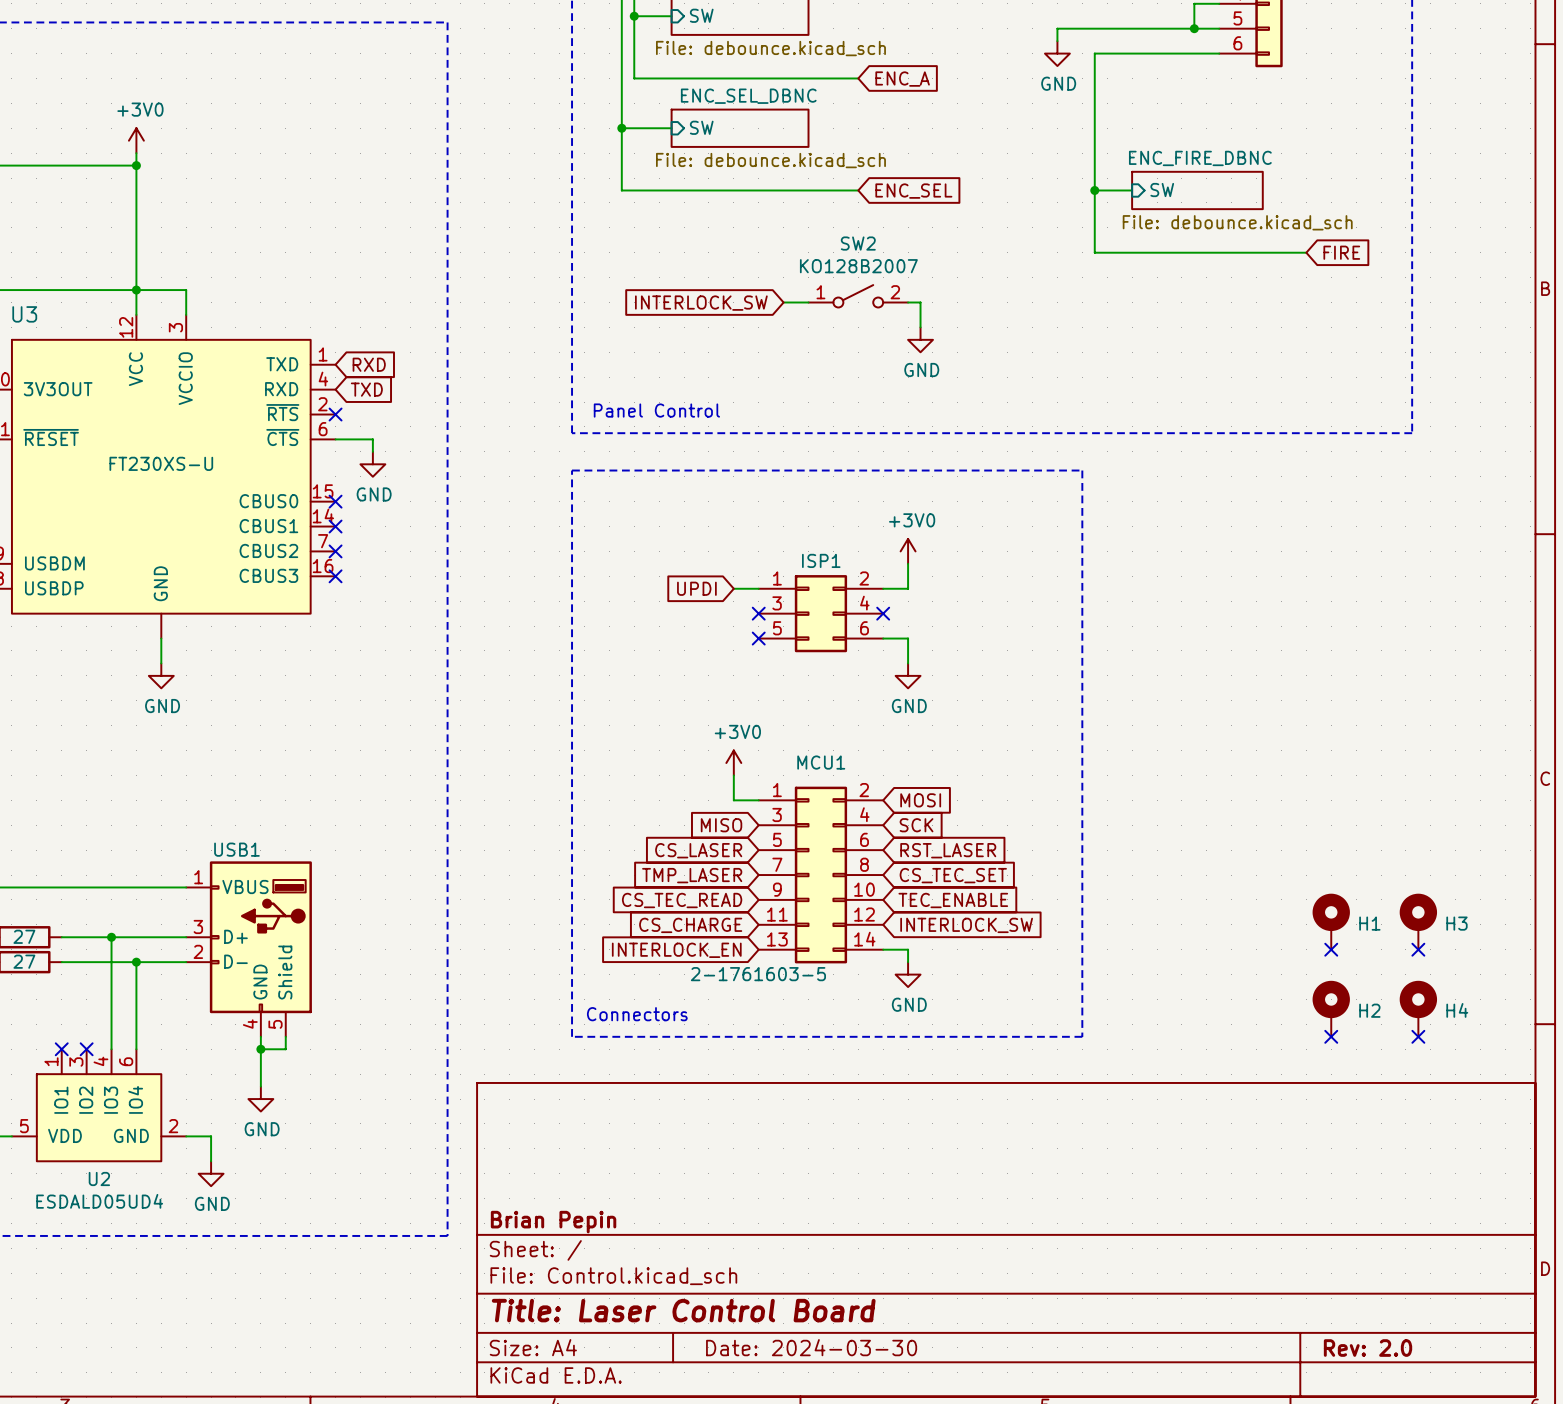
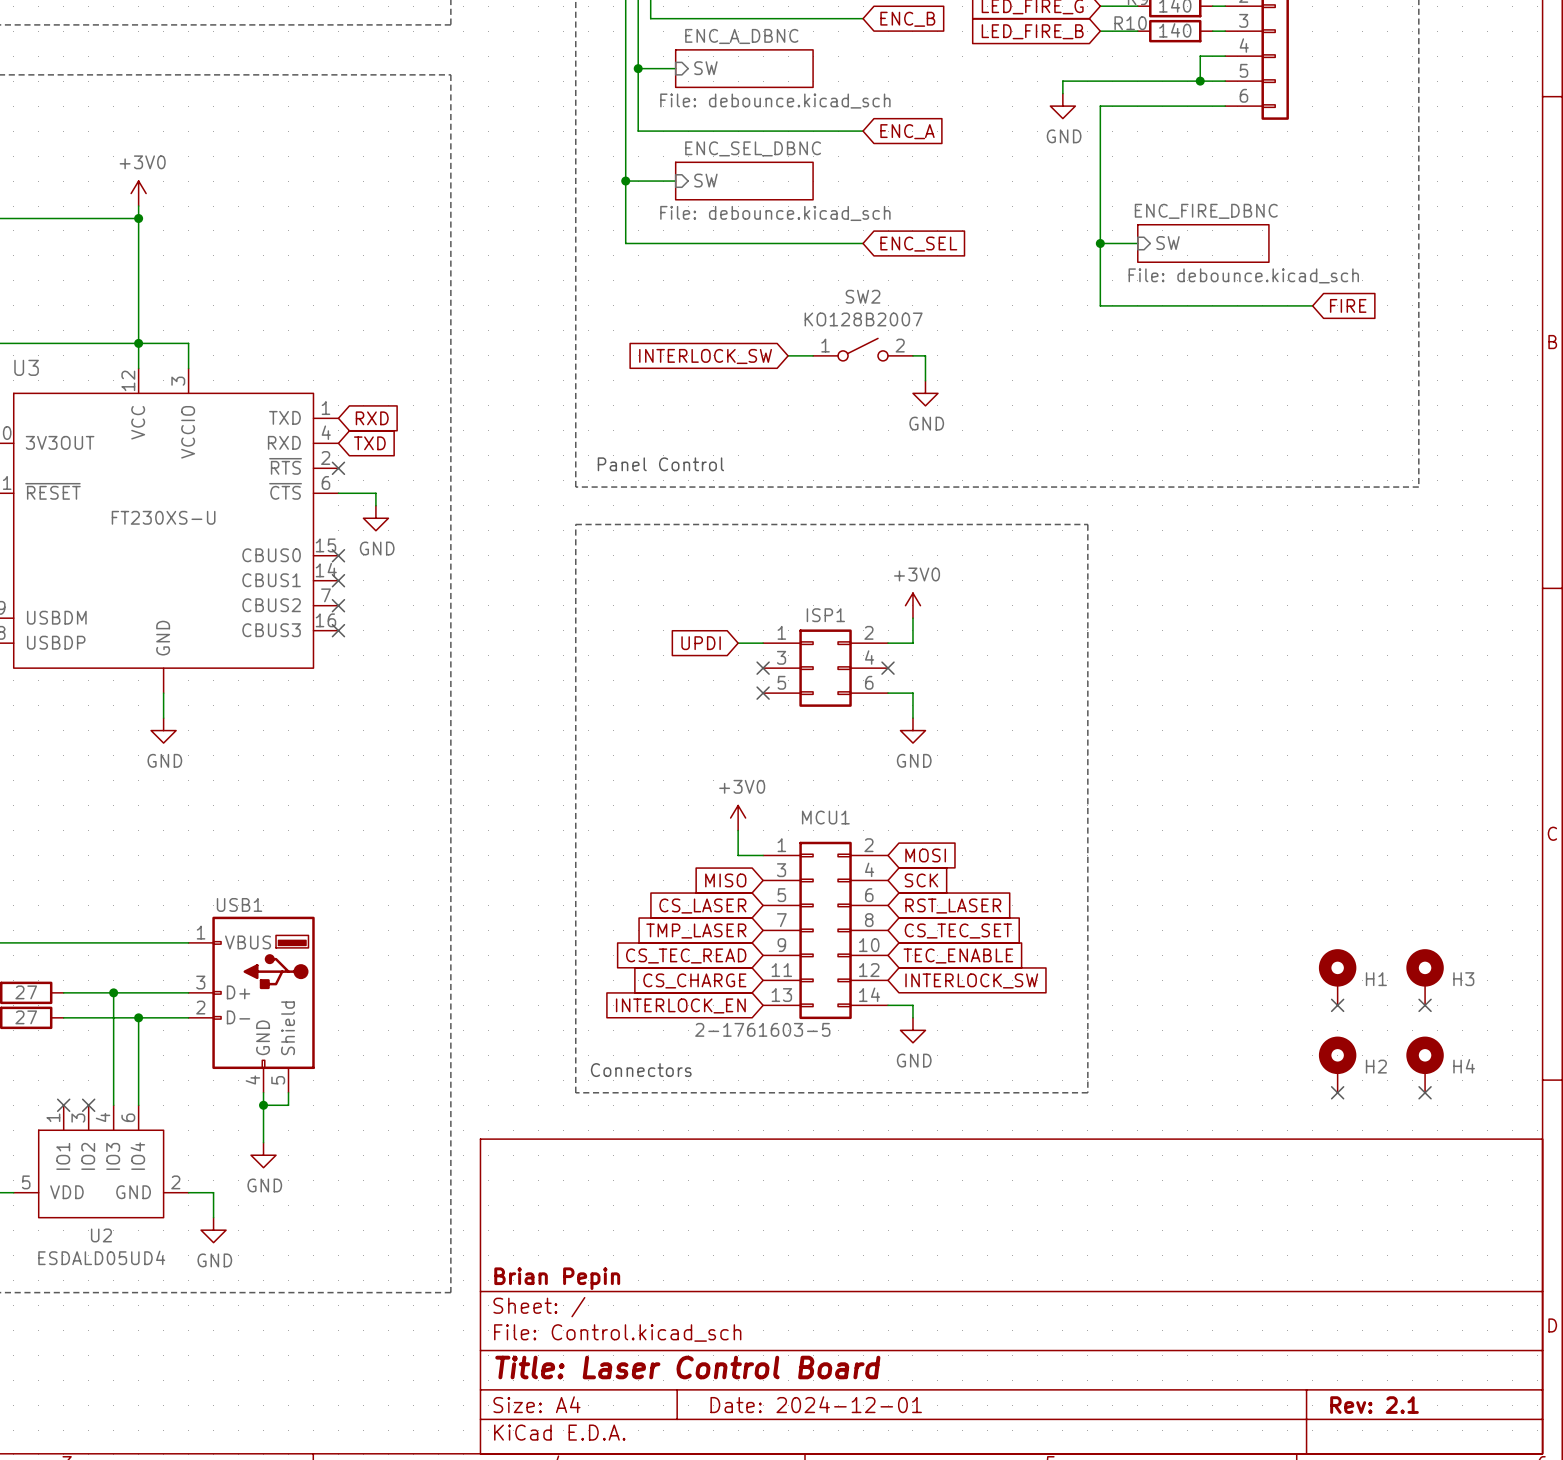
title block: Date: 2024-03-30 (811, 1347) -> Date: 2024-12-01 (816, 1404)
title block: Rev: 2.0 (1368, 1348) -> Rev: 2.1 (1374, 1405)

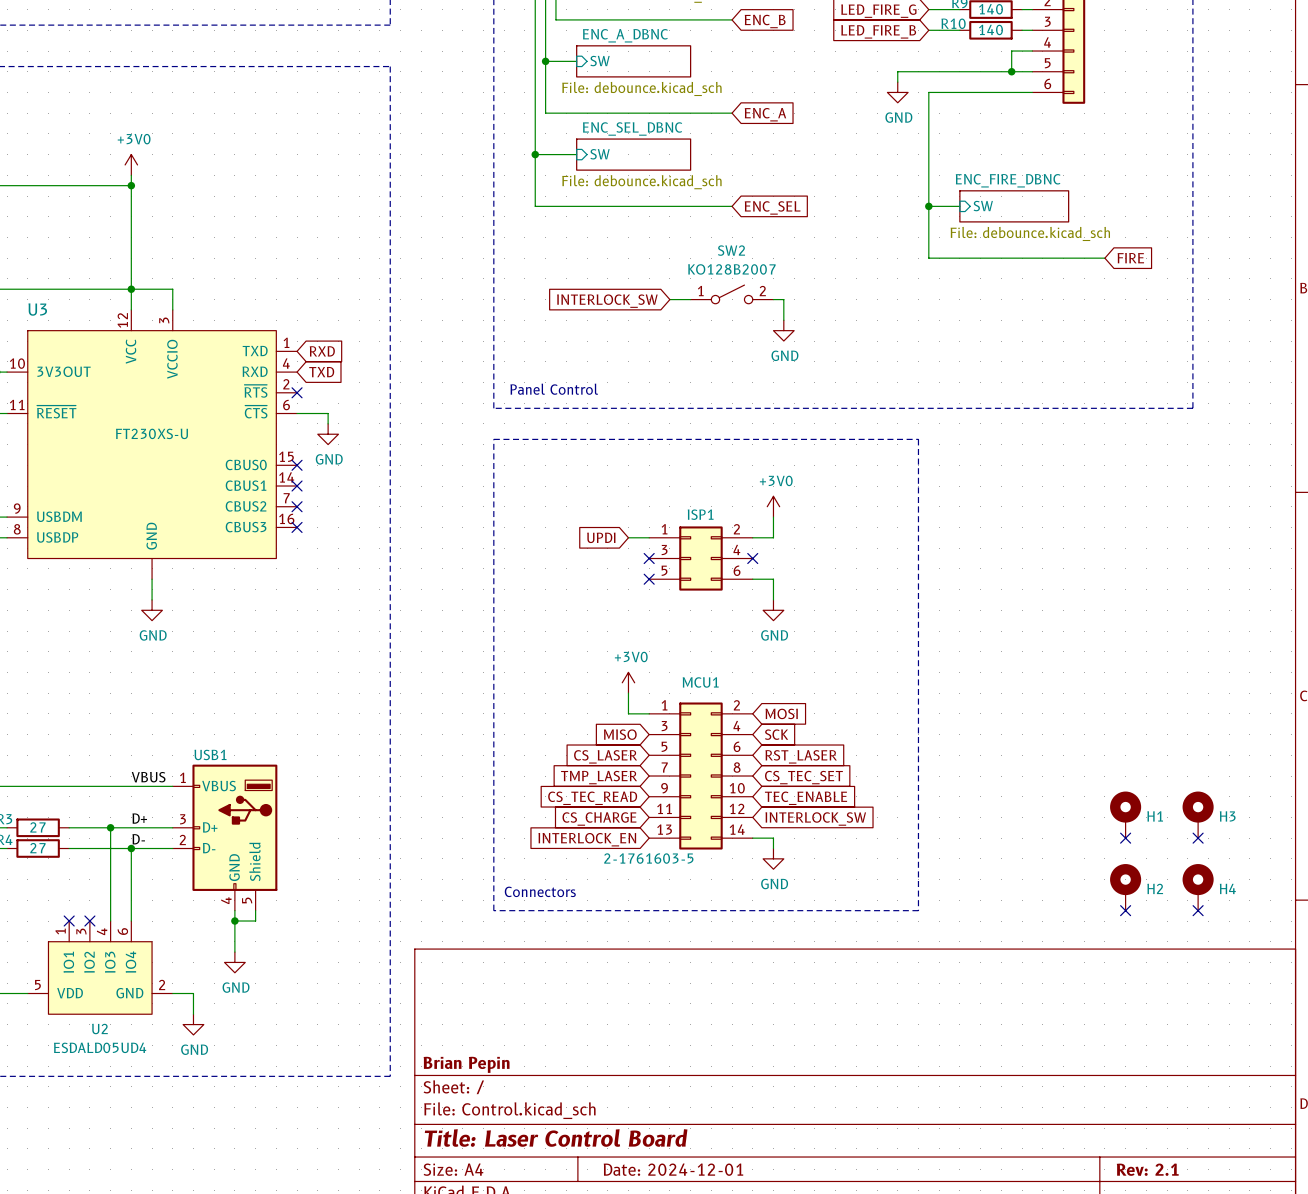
label: none -> VBUS (148, 777)
label: none -> D+ (139, 818)
label: none -> D- (138, 839)

